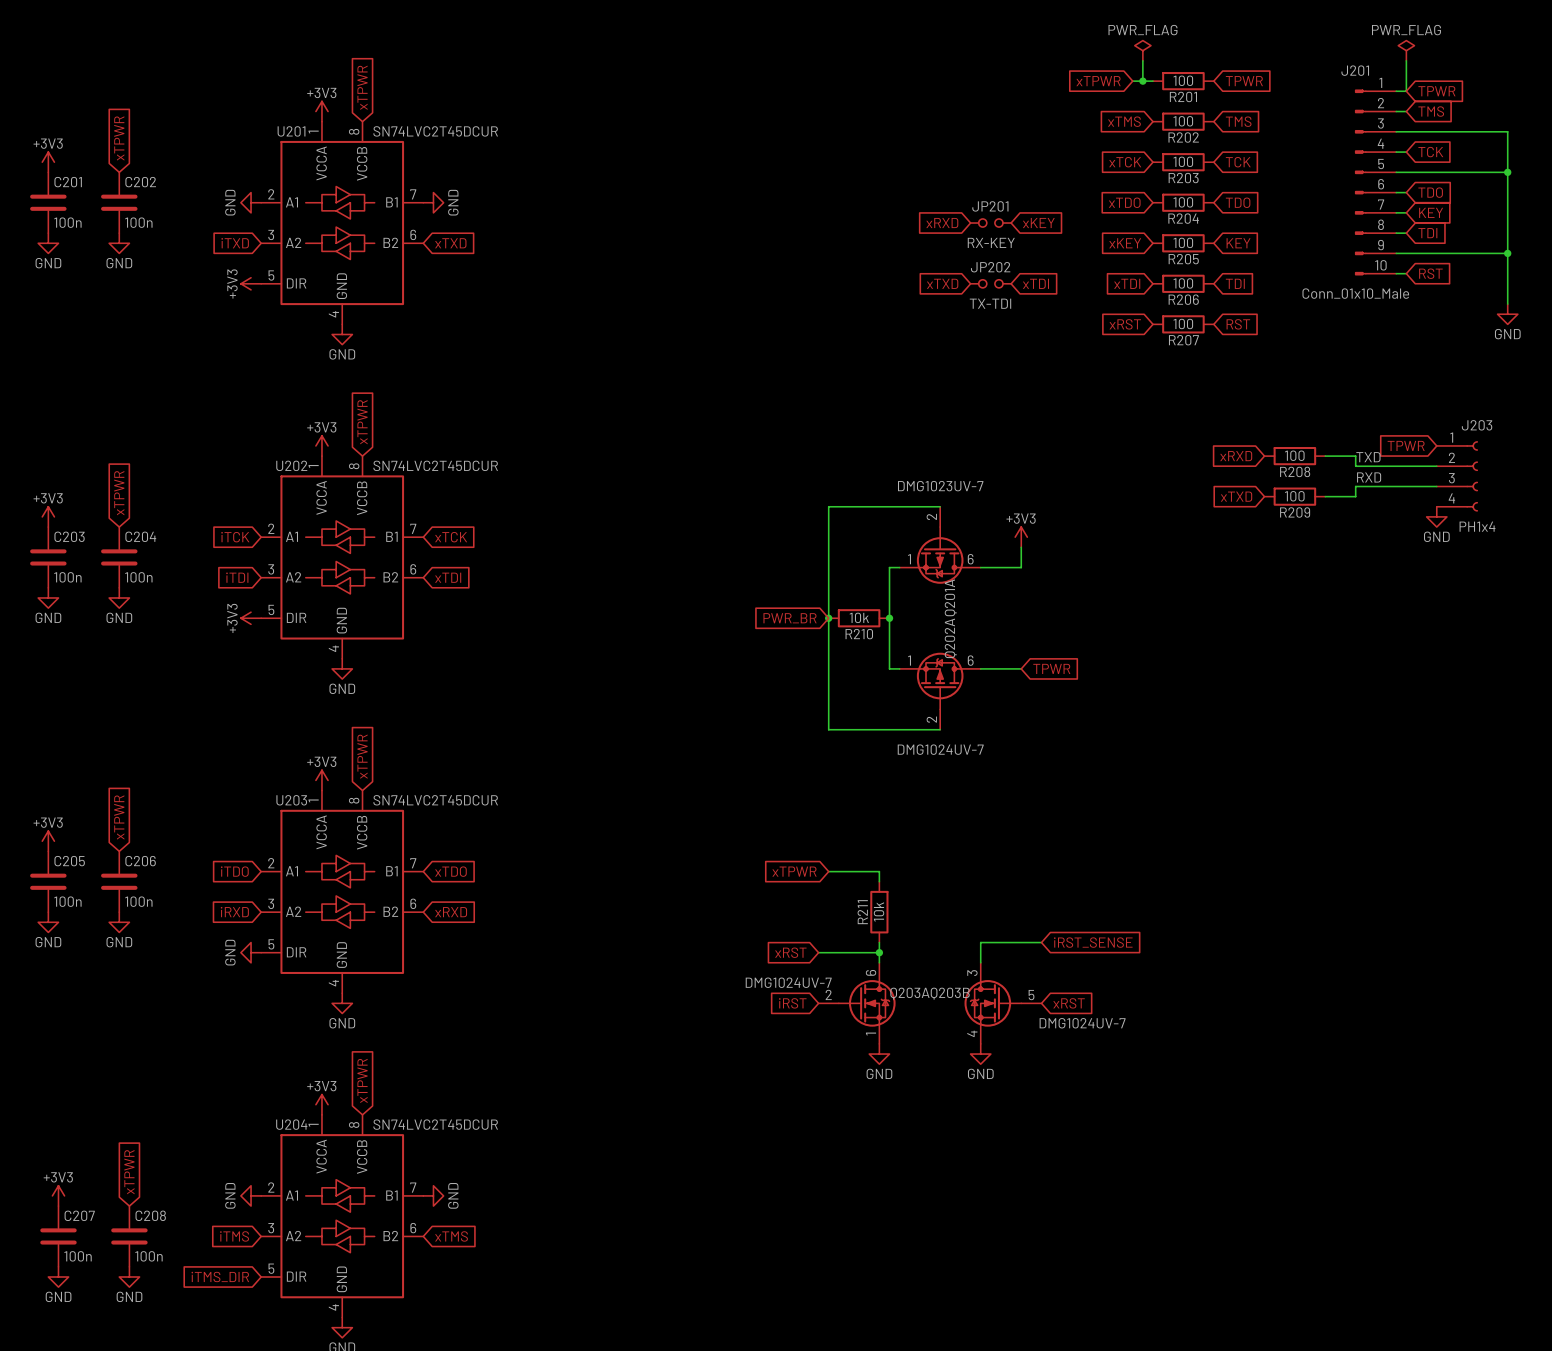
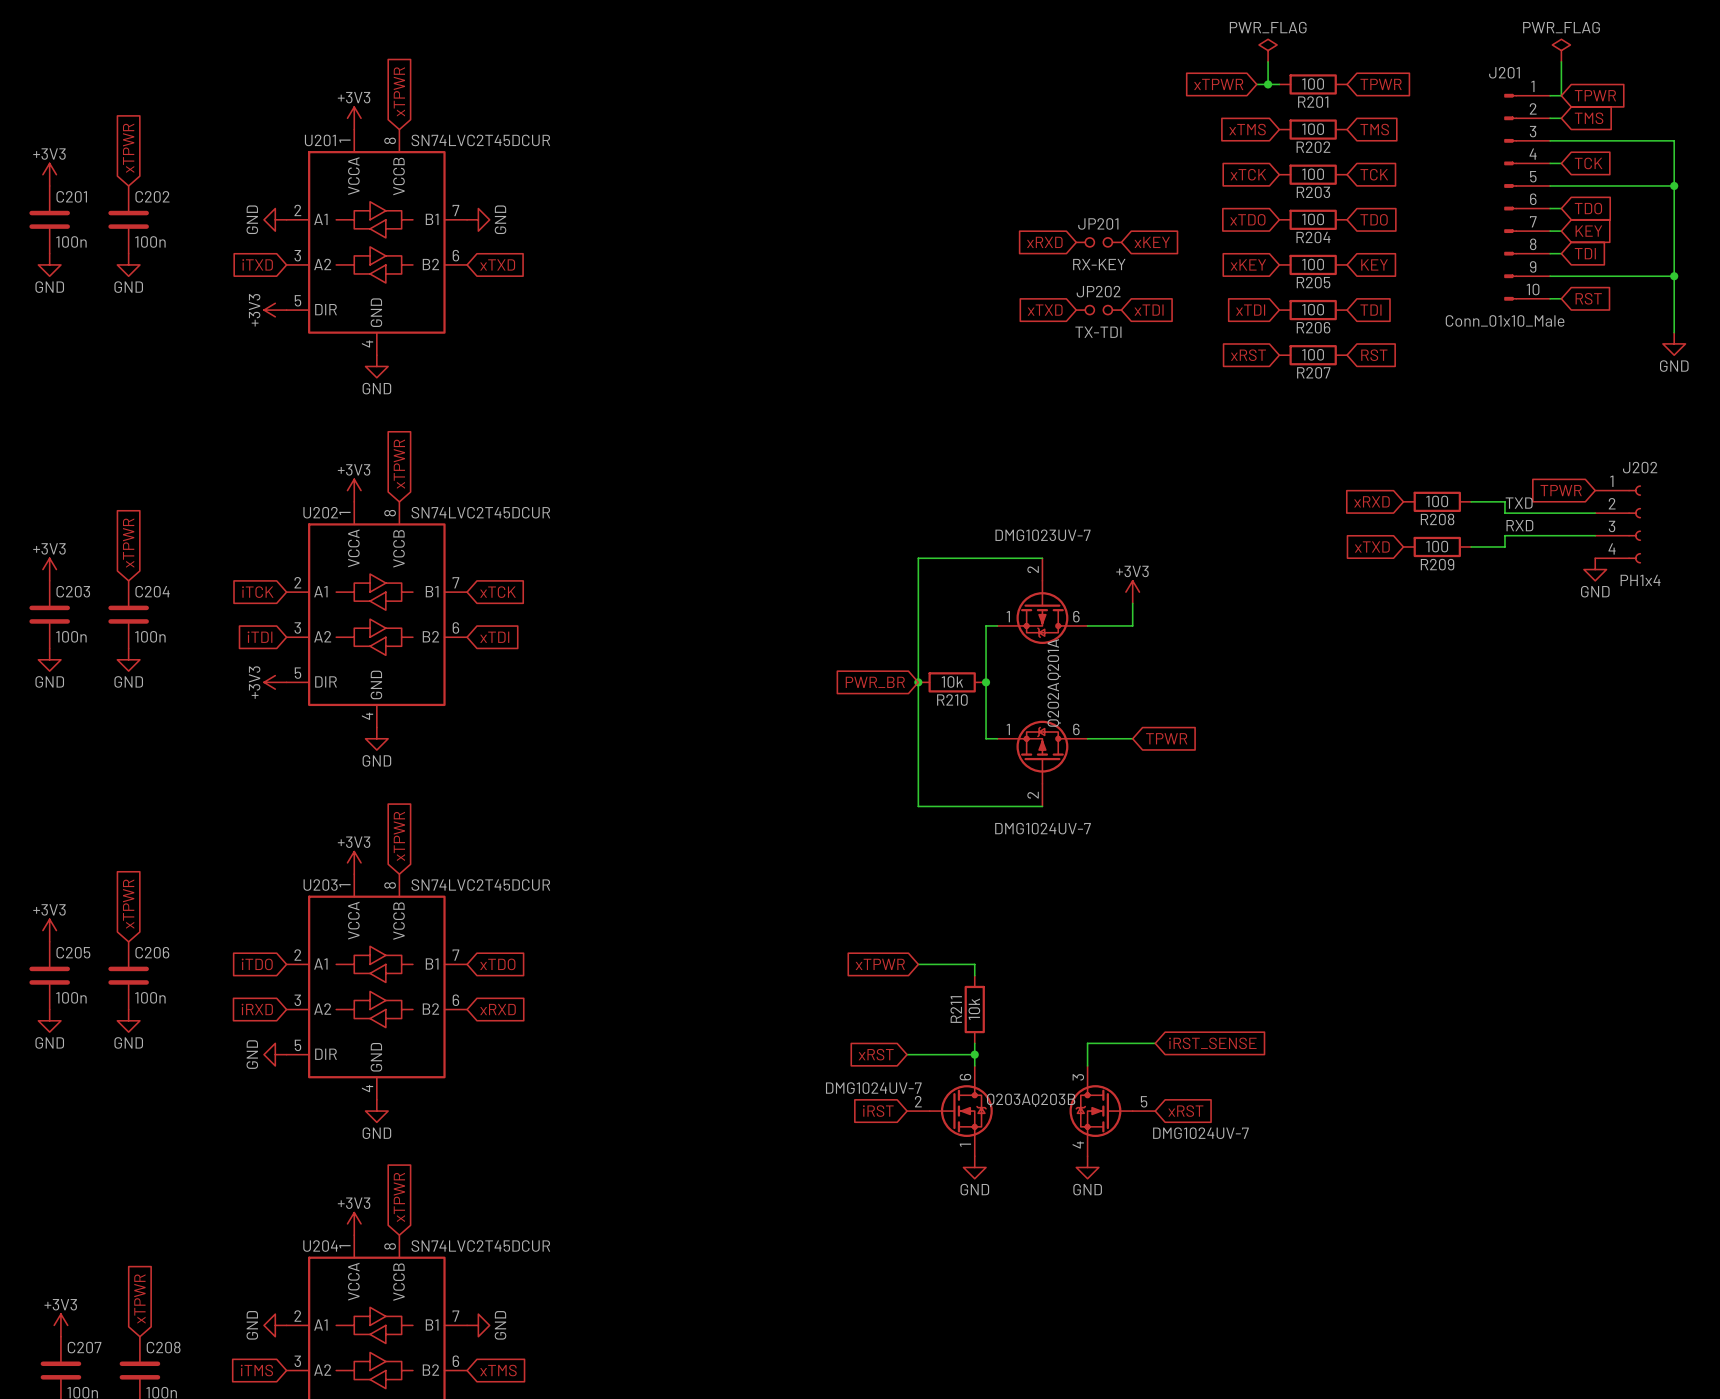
J203 name: J203 (1477, 425) -> J202 (1640, 467)

